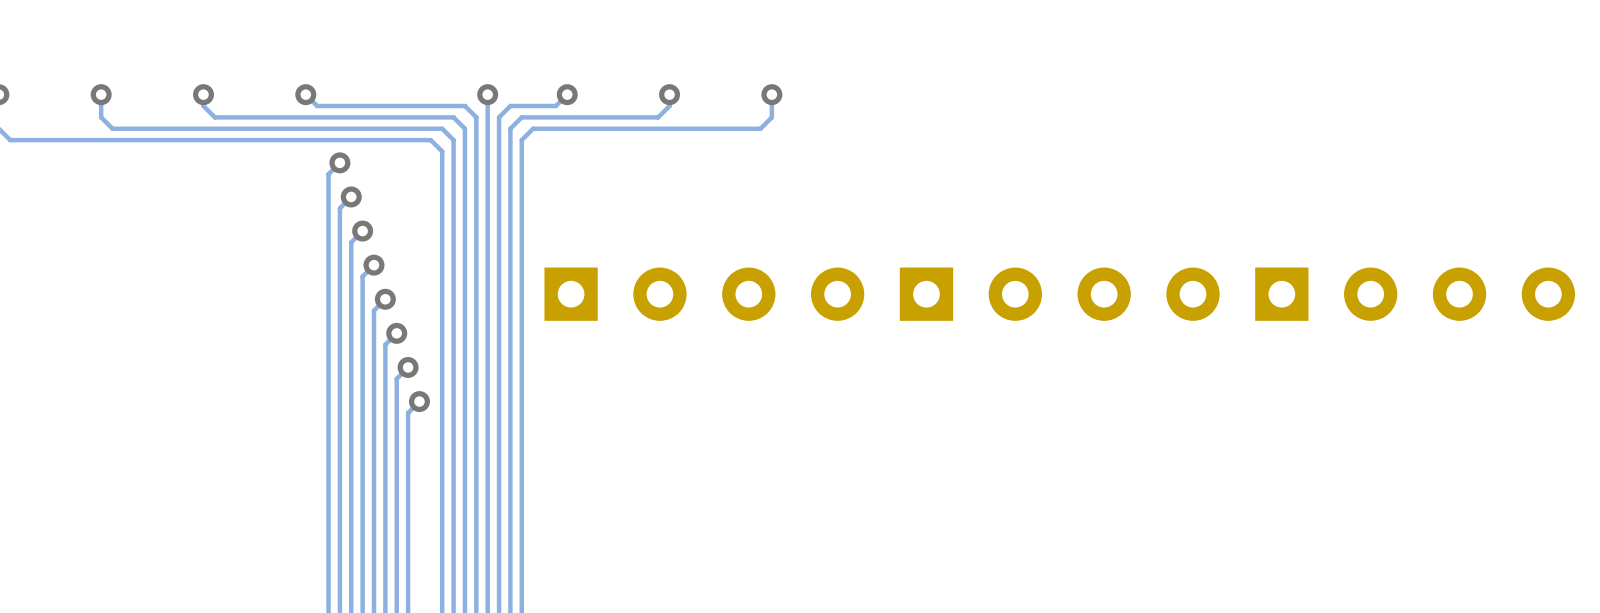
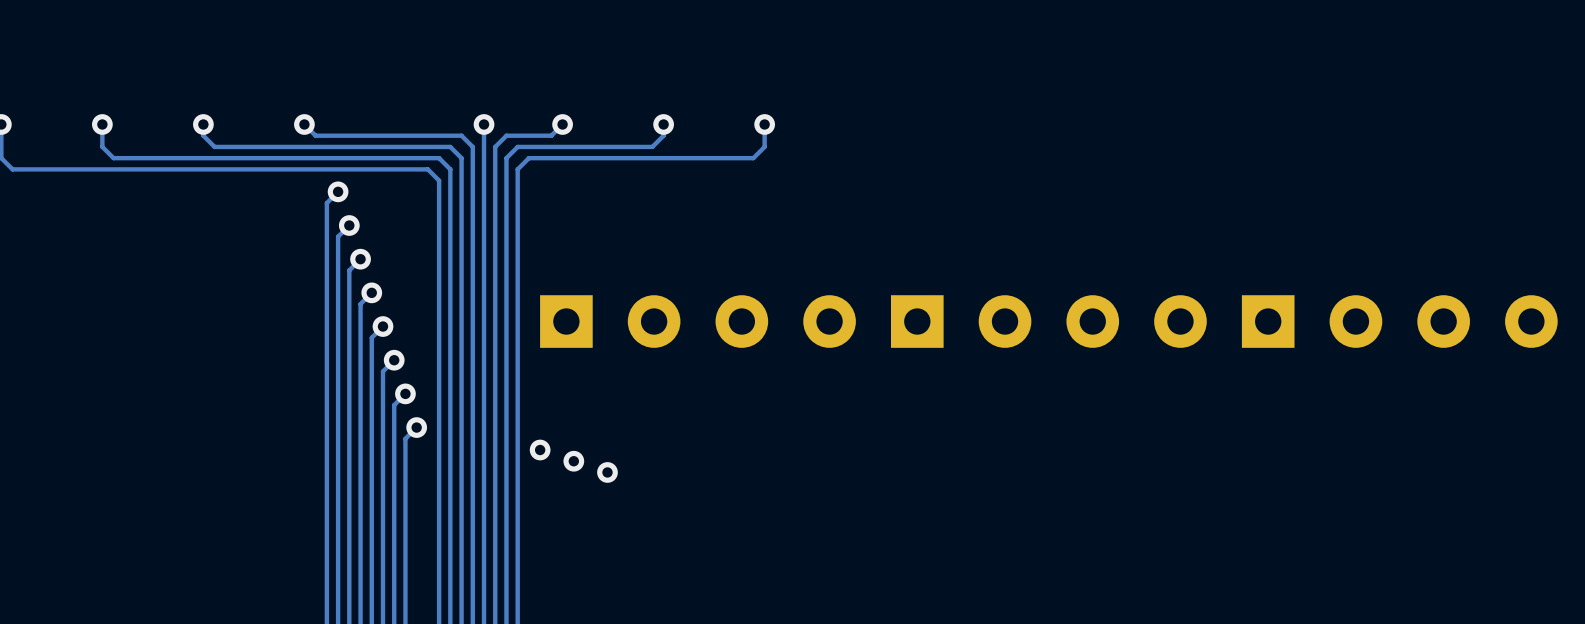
via: none -> (540, 450)
via: none -> (573, 461)
via: none -> (607, 472)

